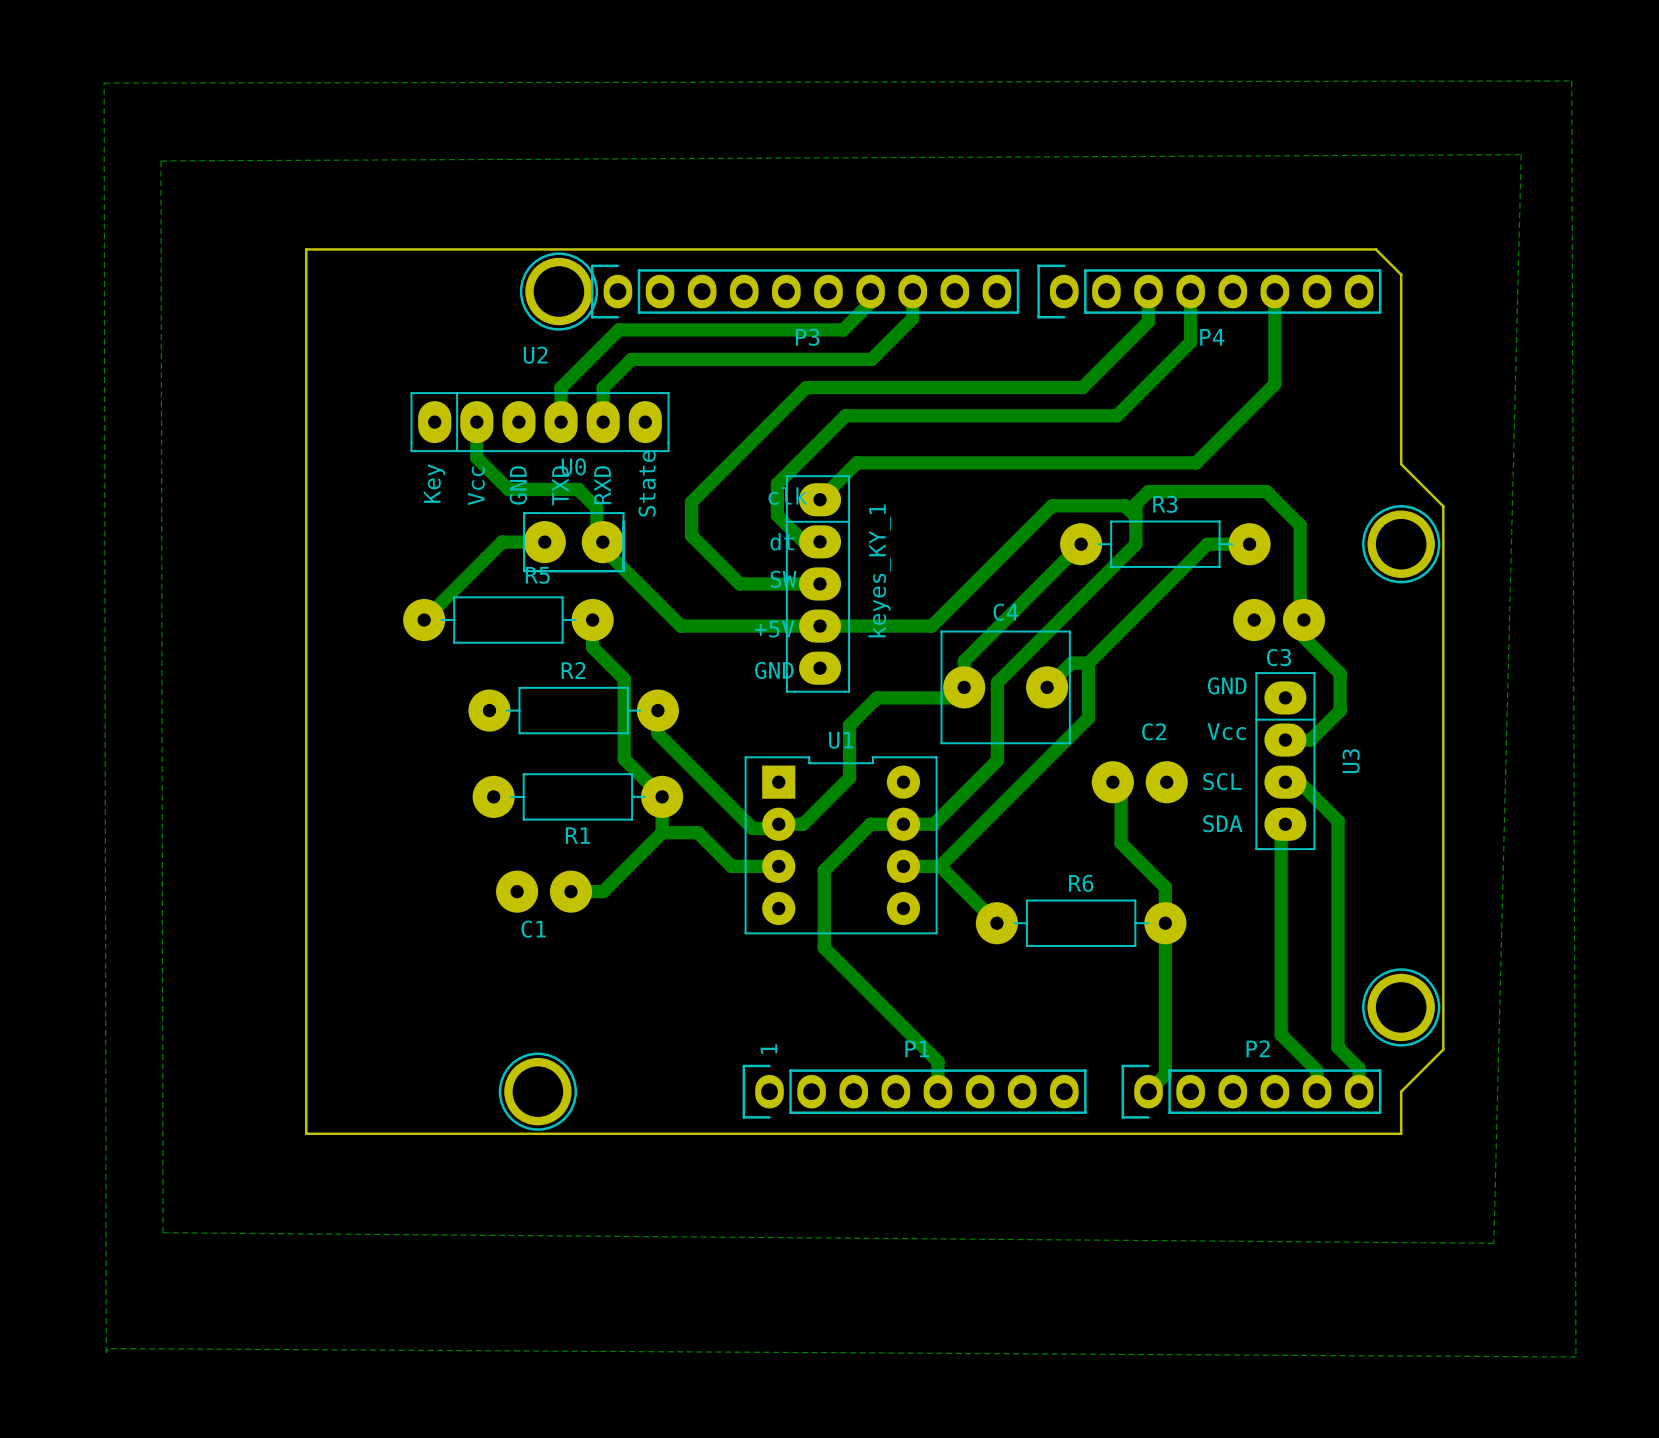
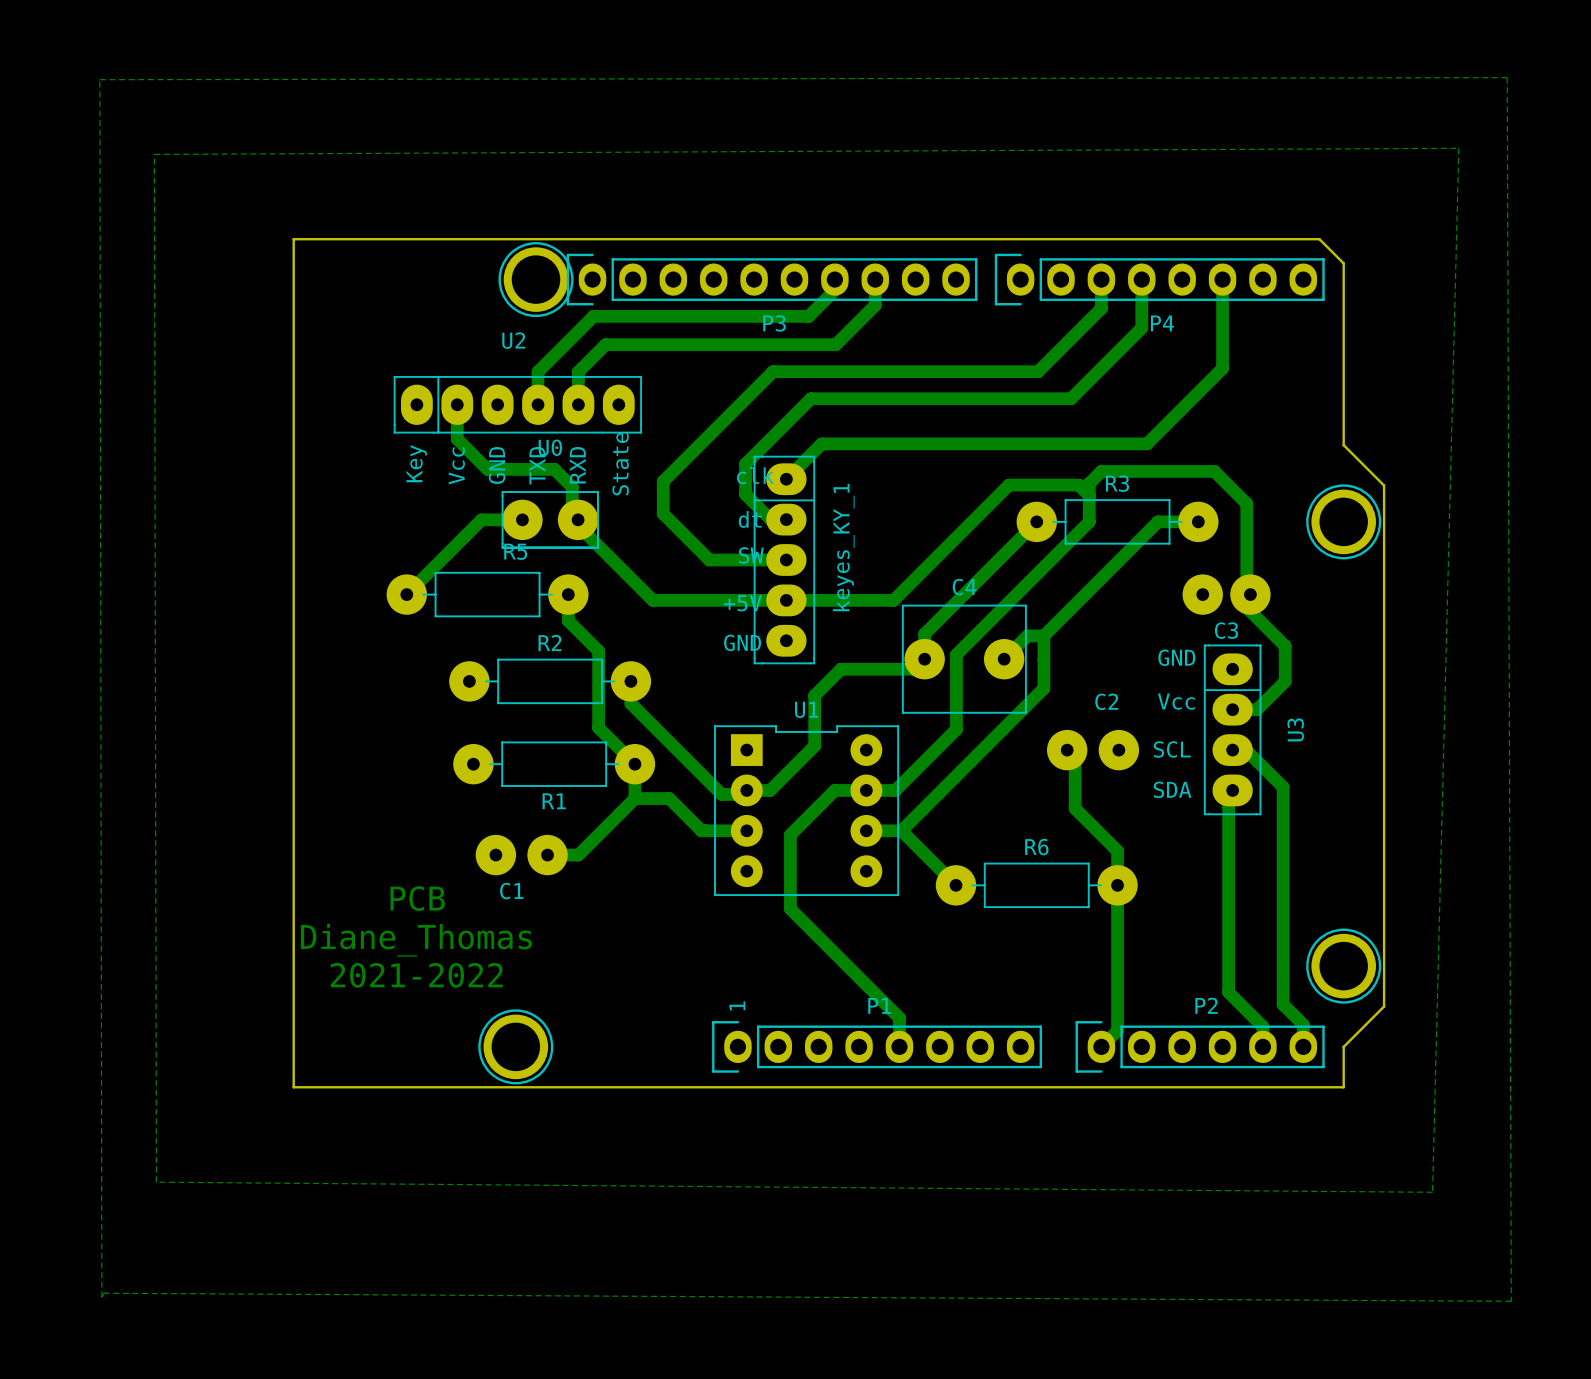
text: none -> PCB (417, 898)
text: none -> Diane_Thomas (416, 940)
text: none -> 2021-2022 (416, 975)

